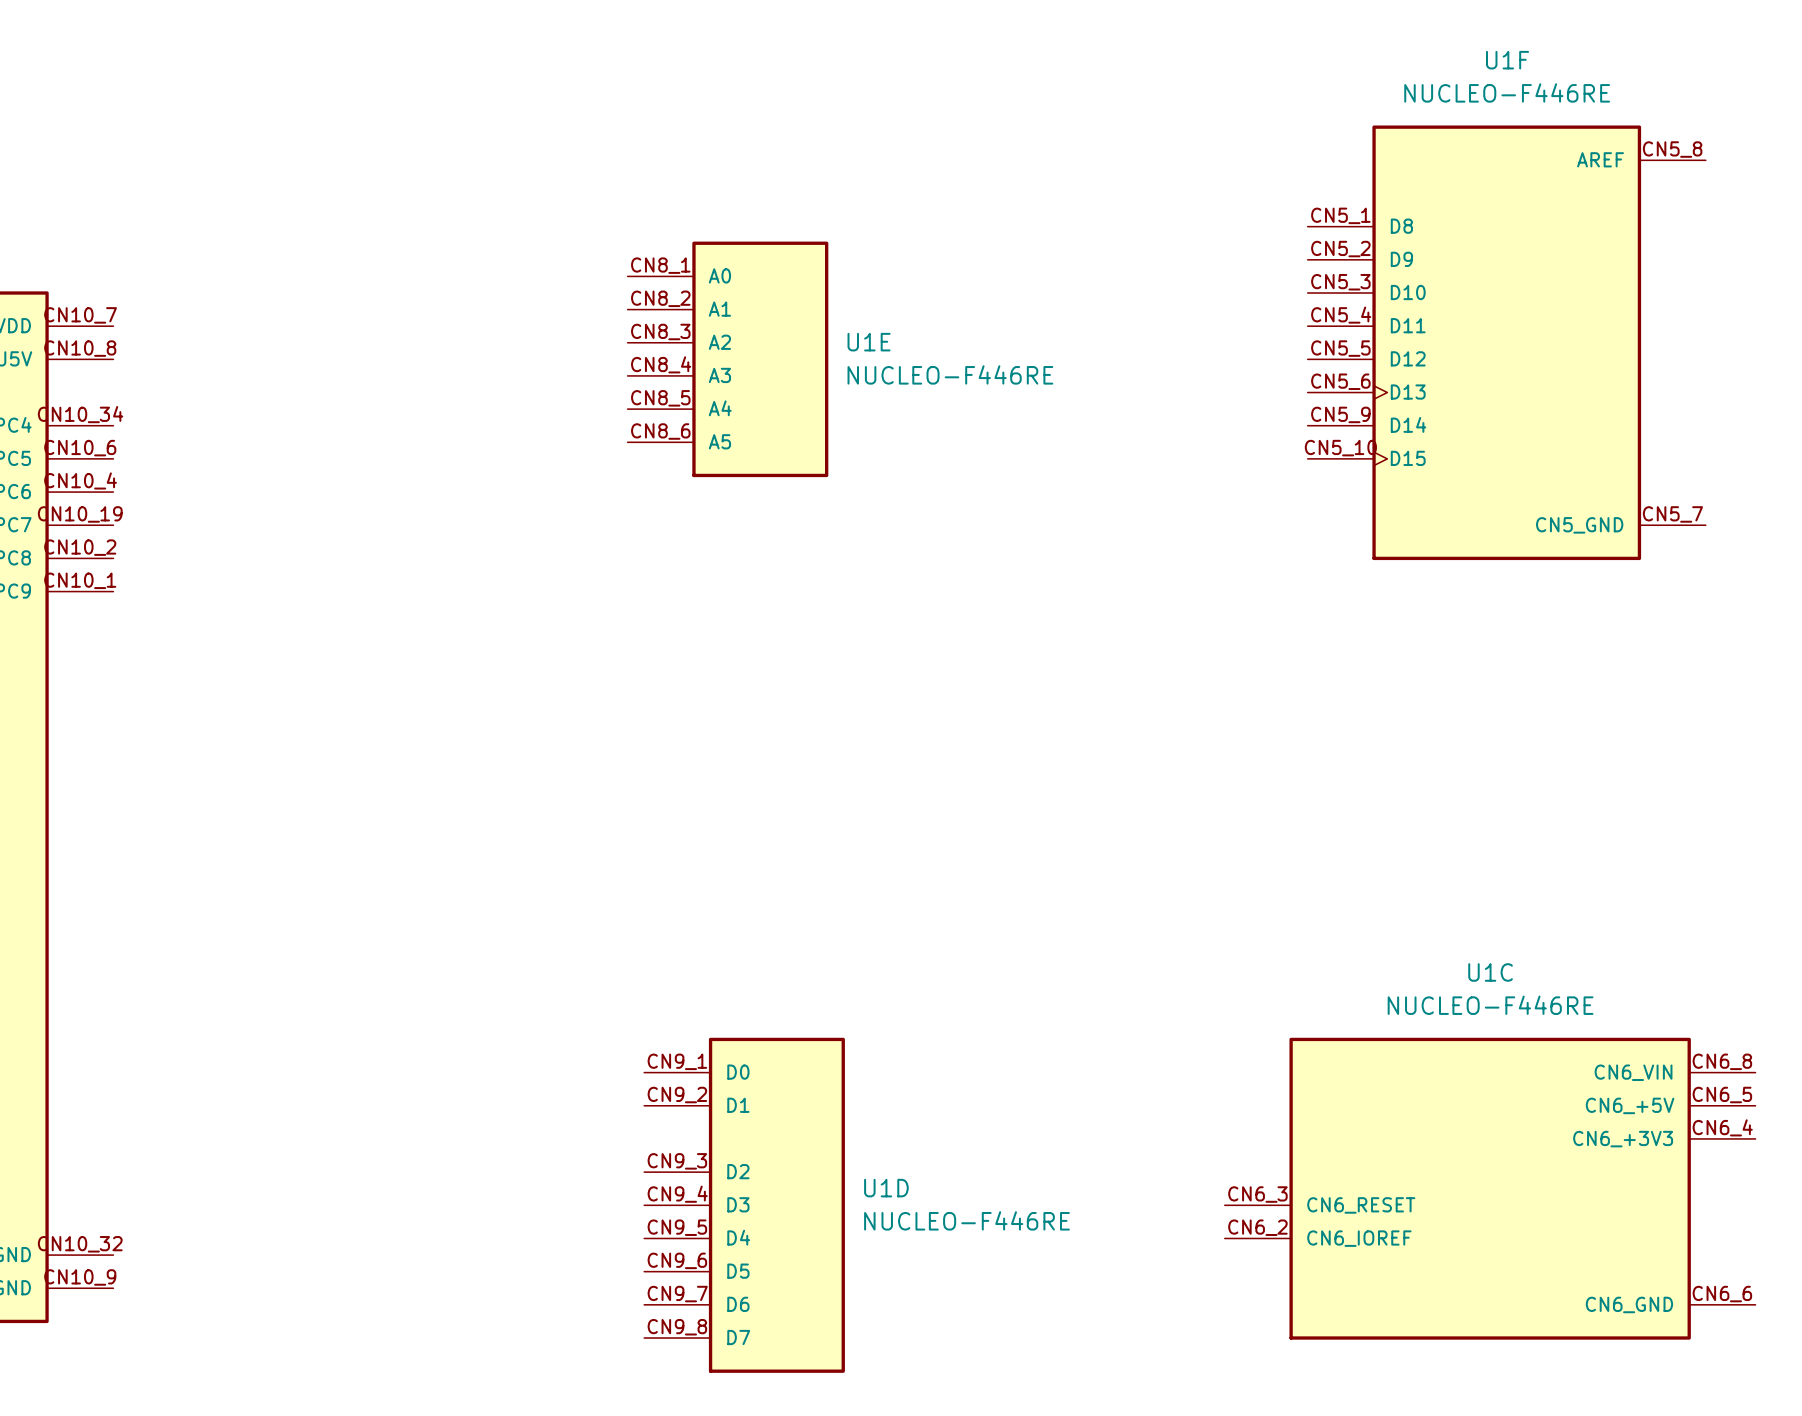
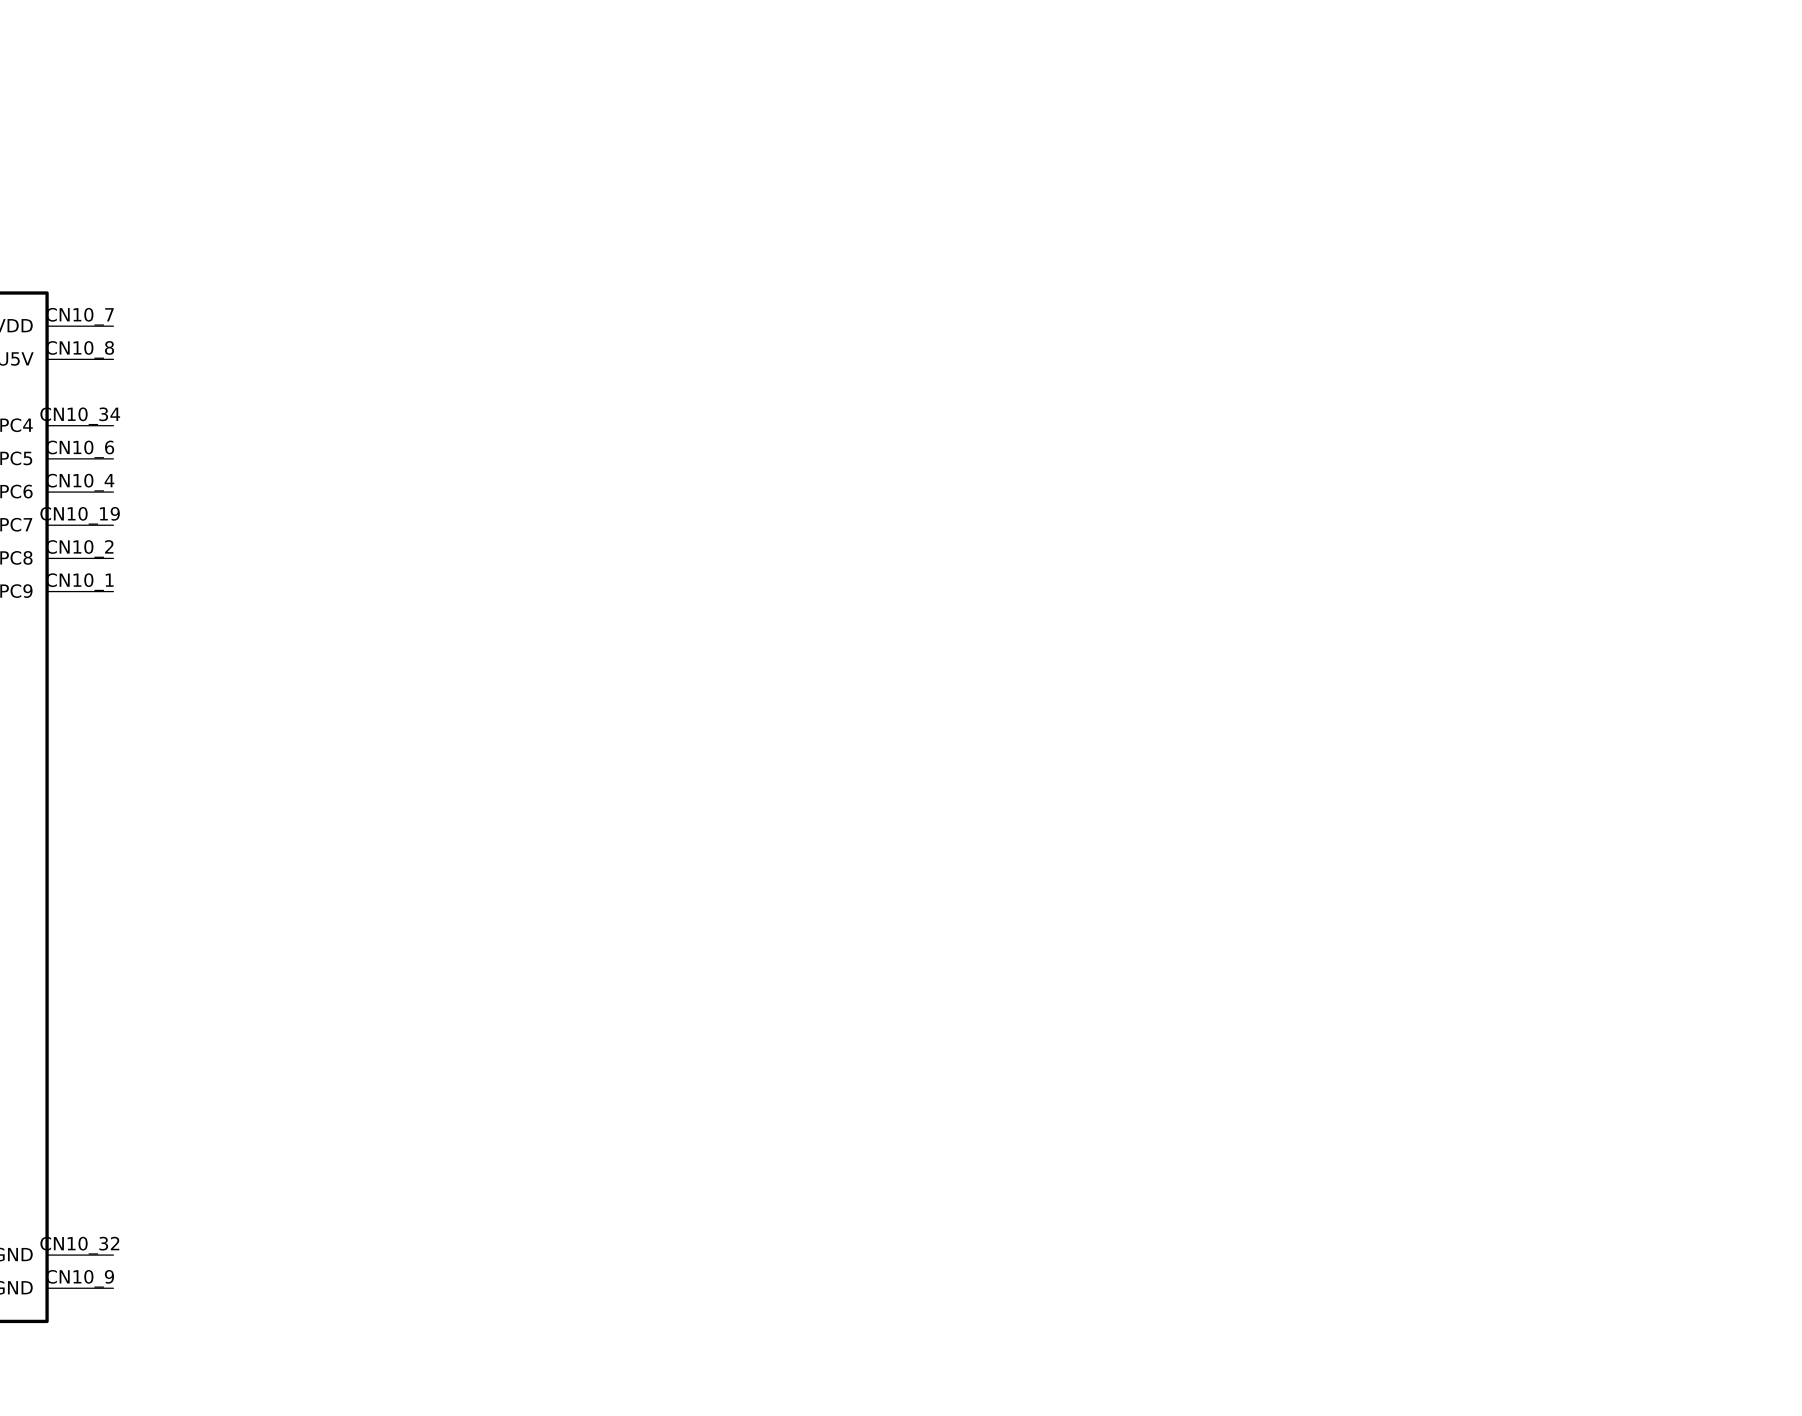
U1F: NUCLEO-F446RE (1506, 342) -> none
U1E: NUCLEO-F446RE (727, 359) -> none
U1C: NUCLEO-F446RE (1490, 1188) -> none
U1D: NUCLEO-F446RE (744, 1205) -> none

